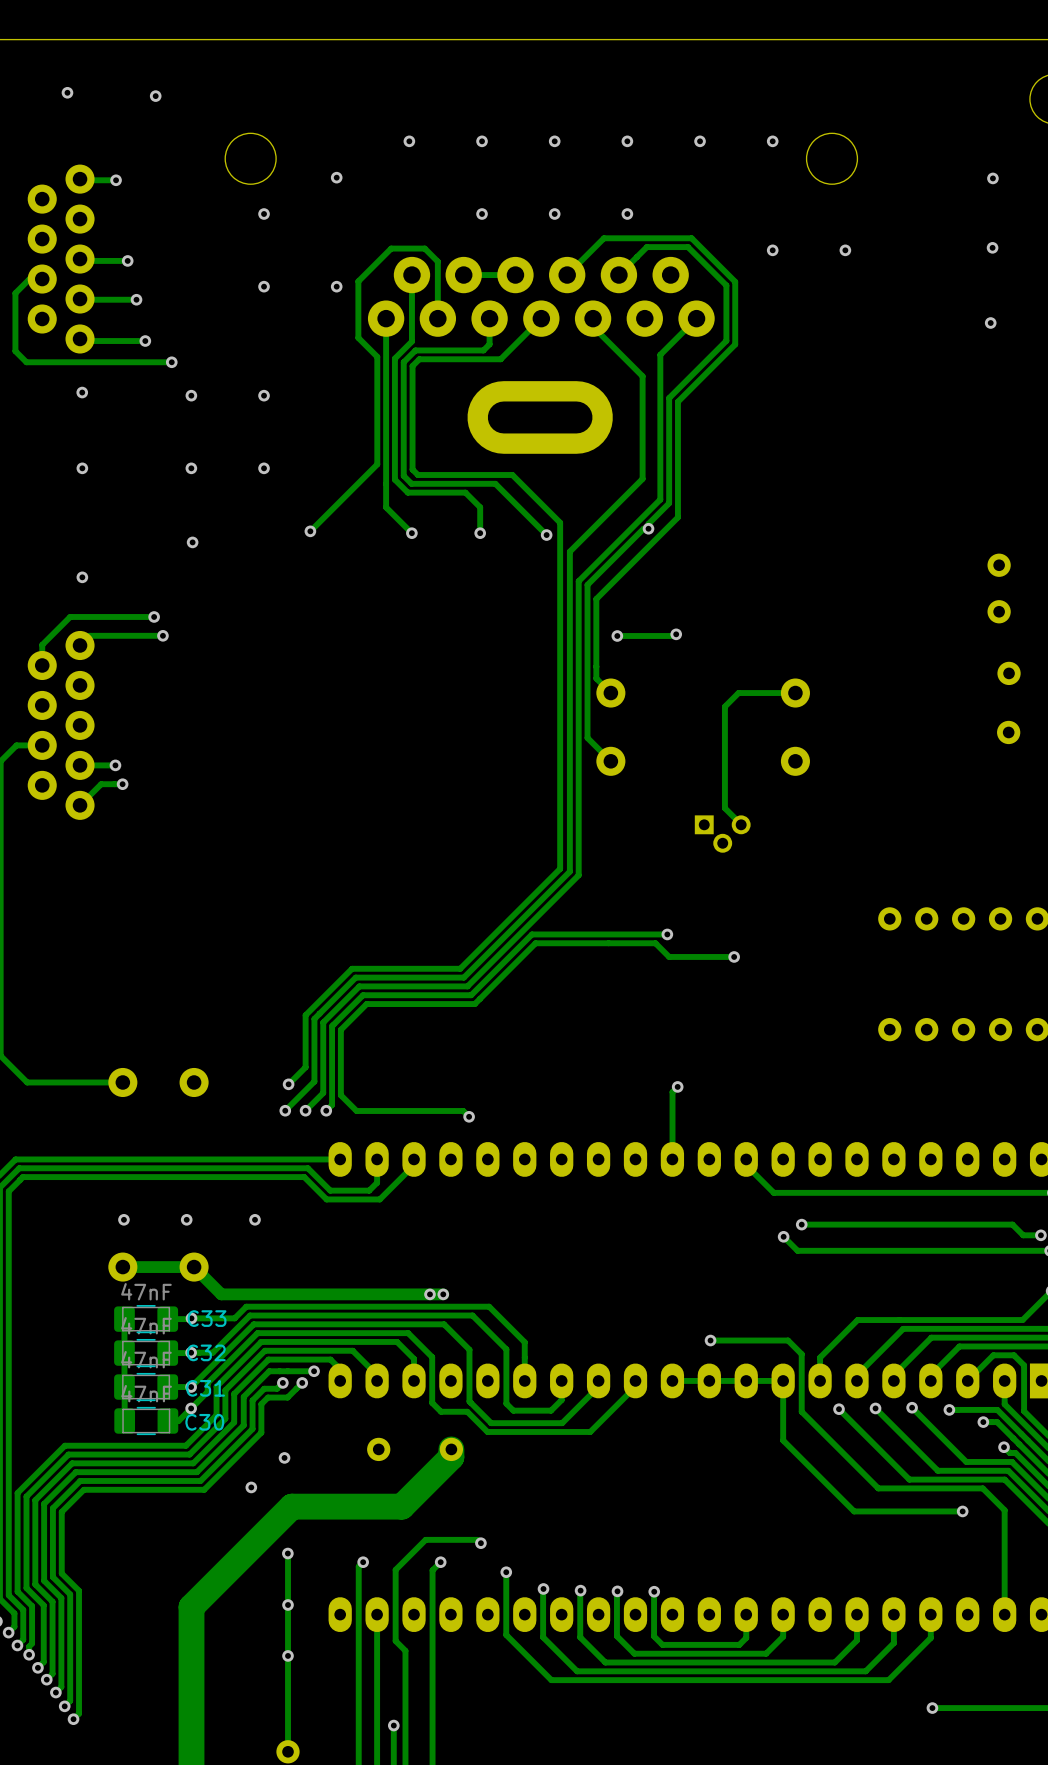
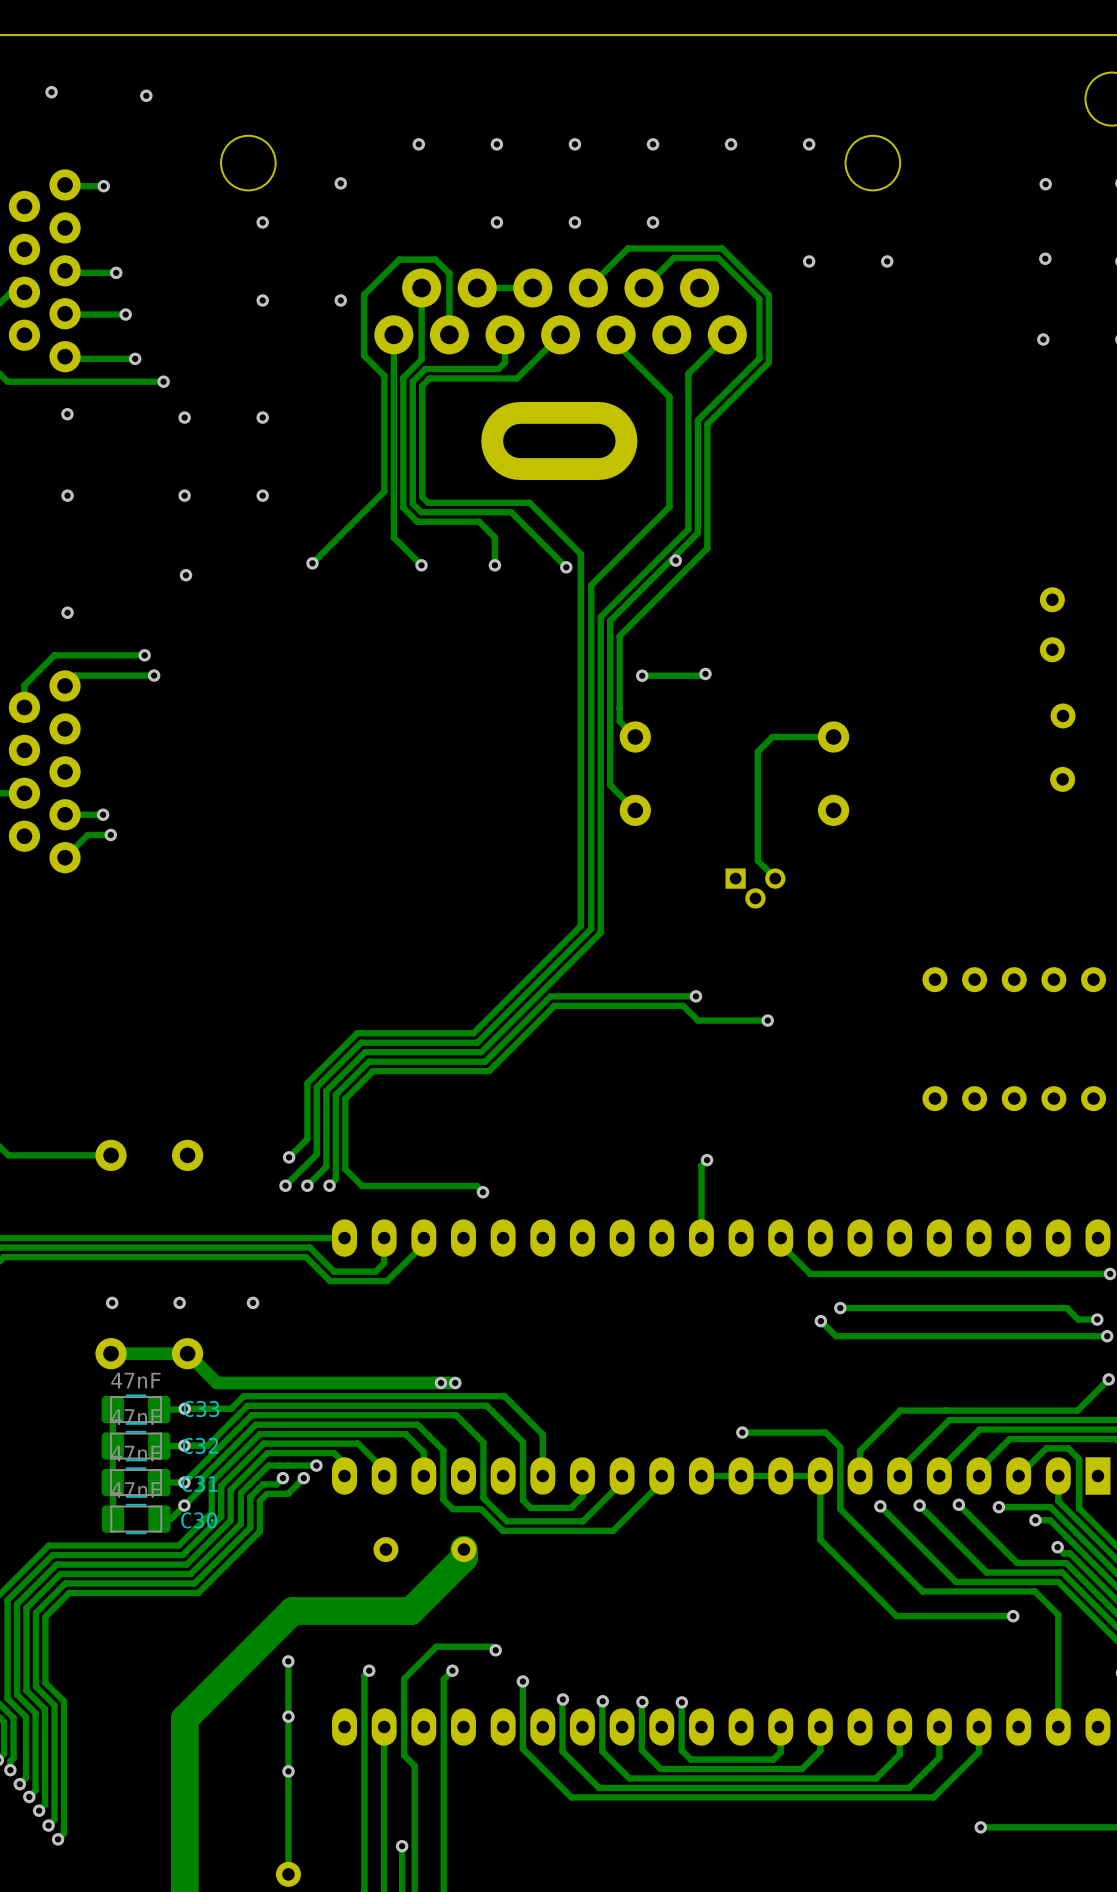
via: (284, 1457) -> none
via: (251, 1487) -> none

